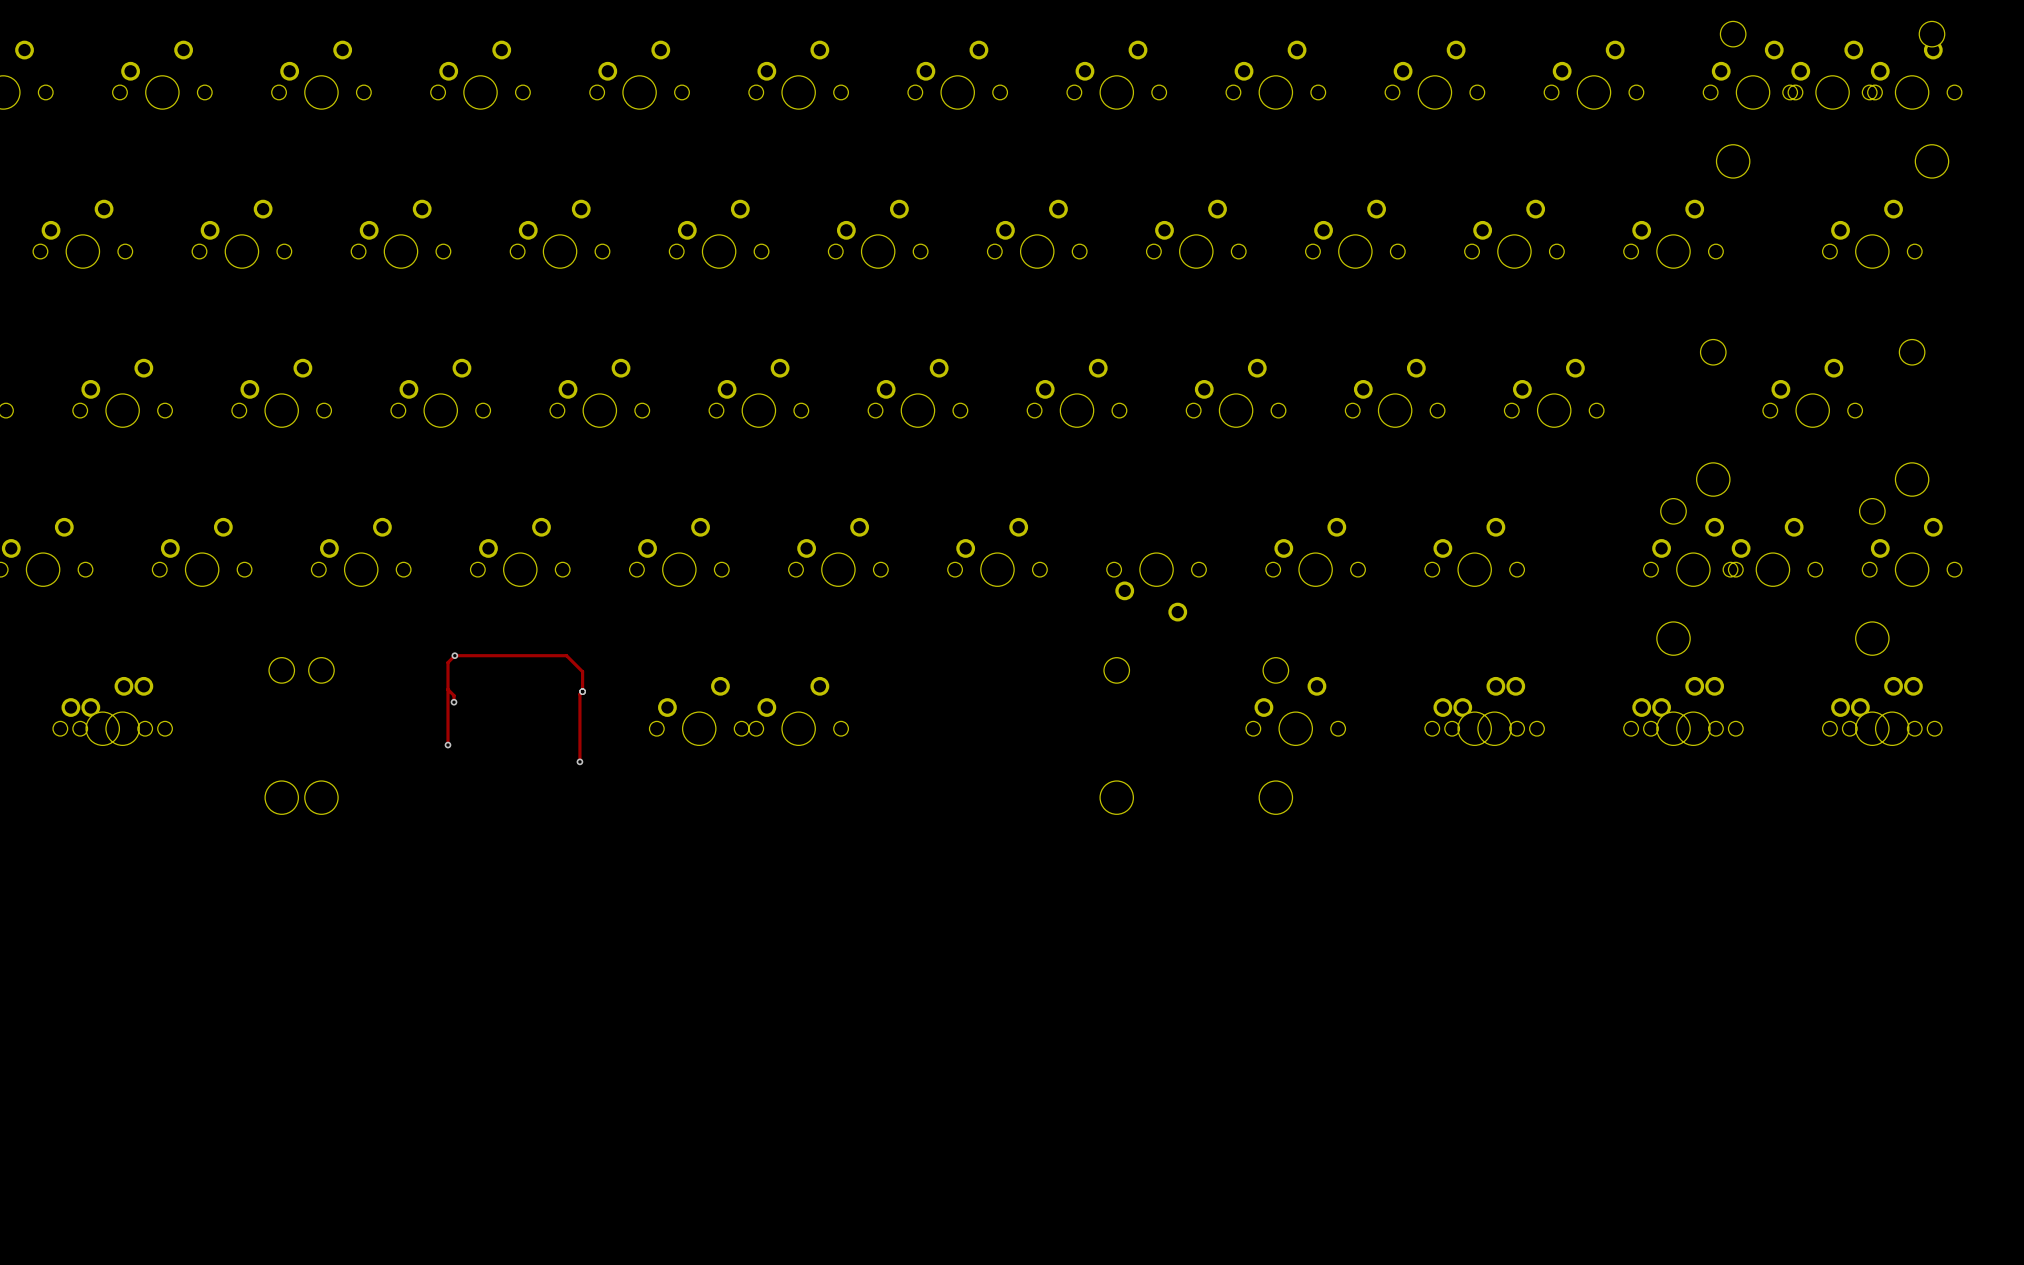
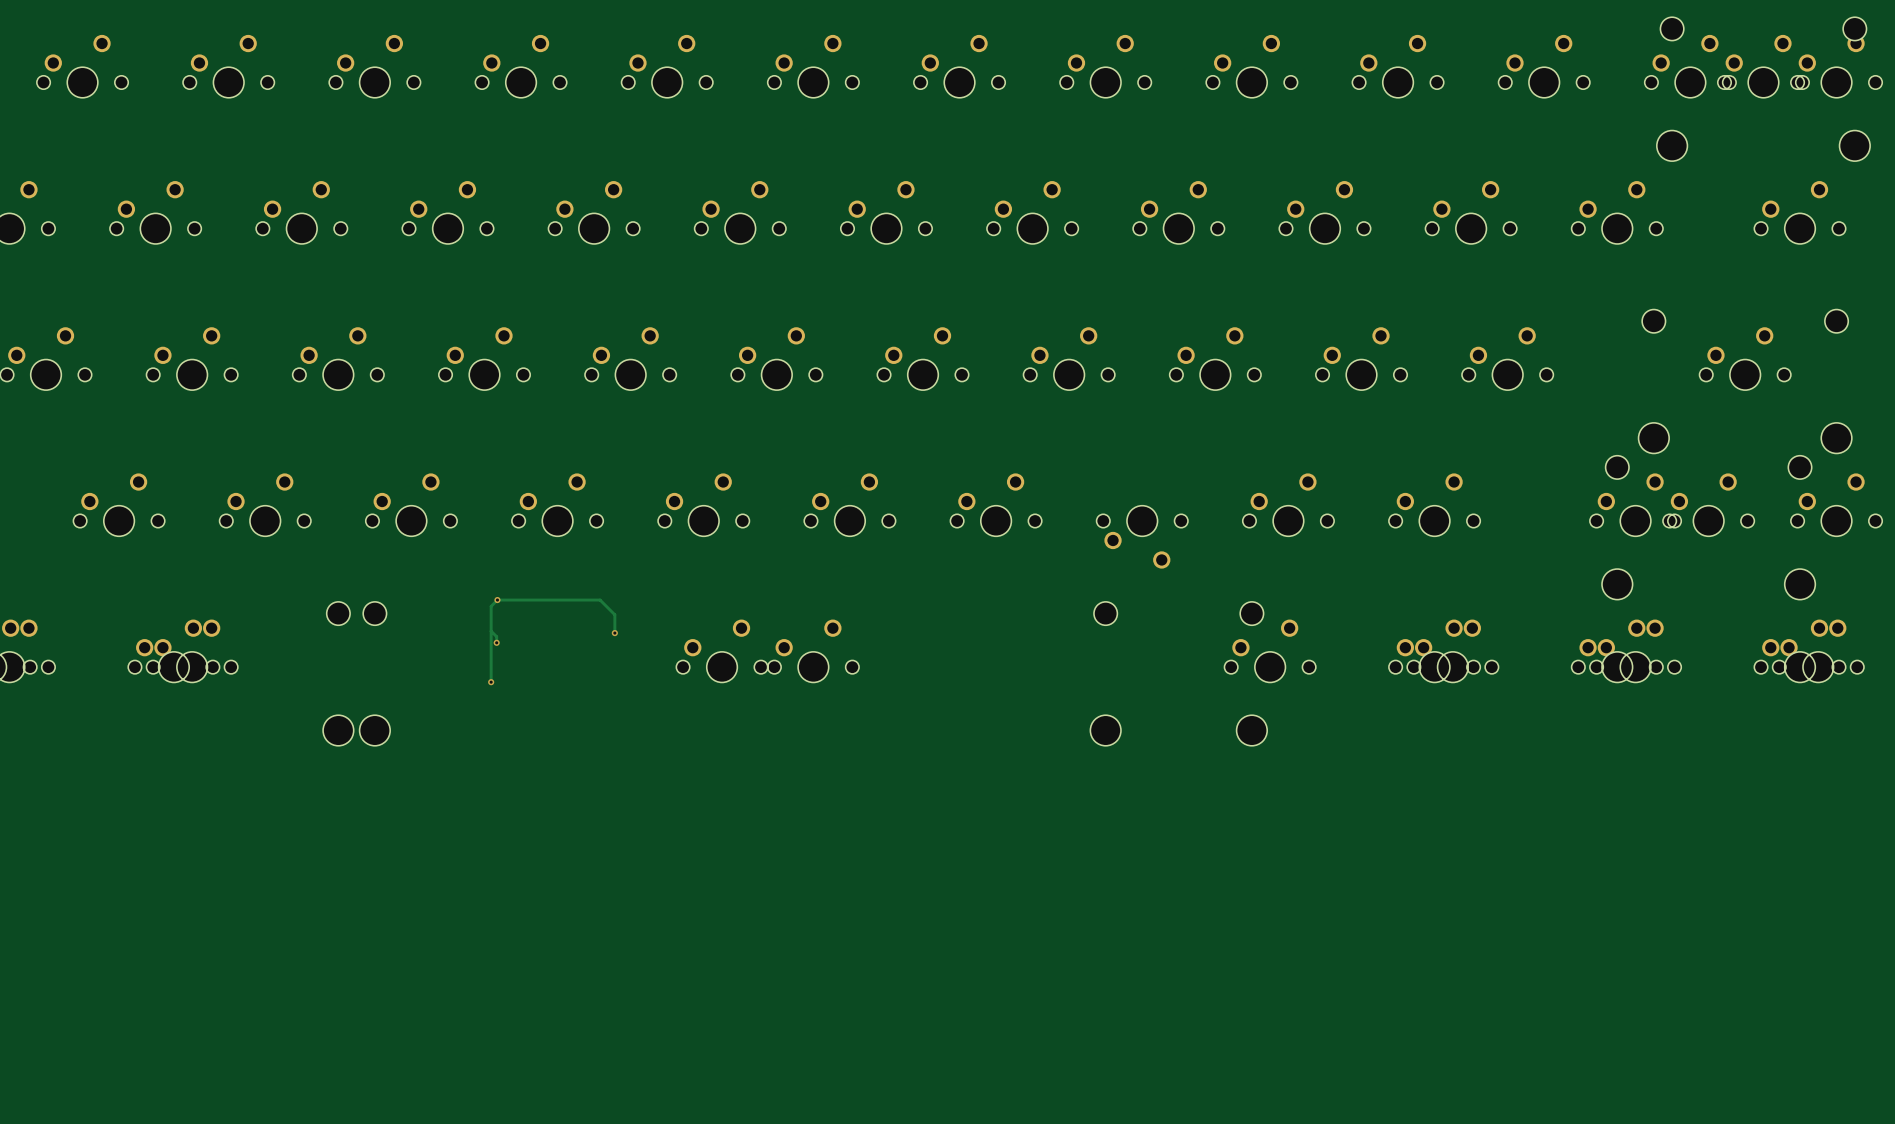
track: (582, 691) (579, 694) (579, 761) -> none
via: (579, 761) -> none

